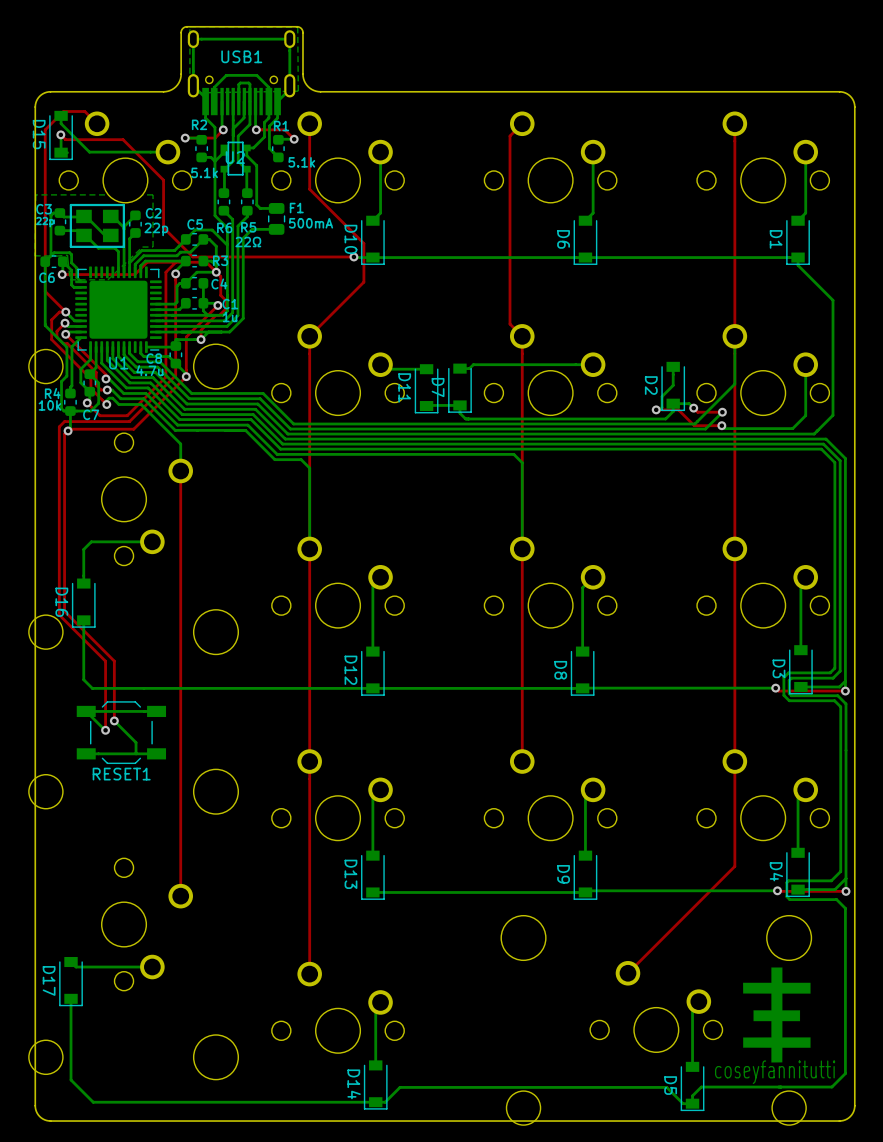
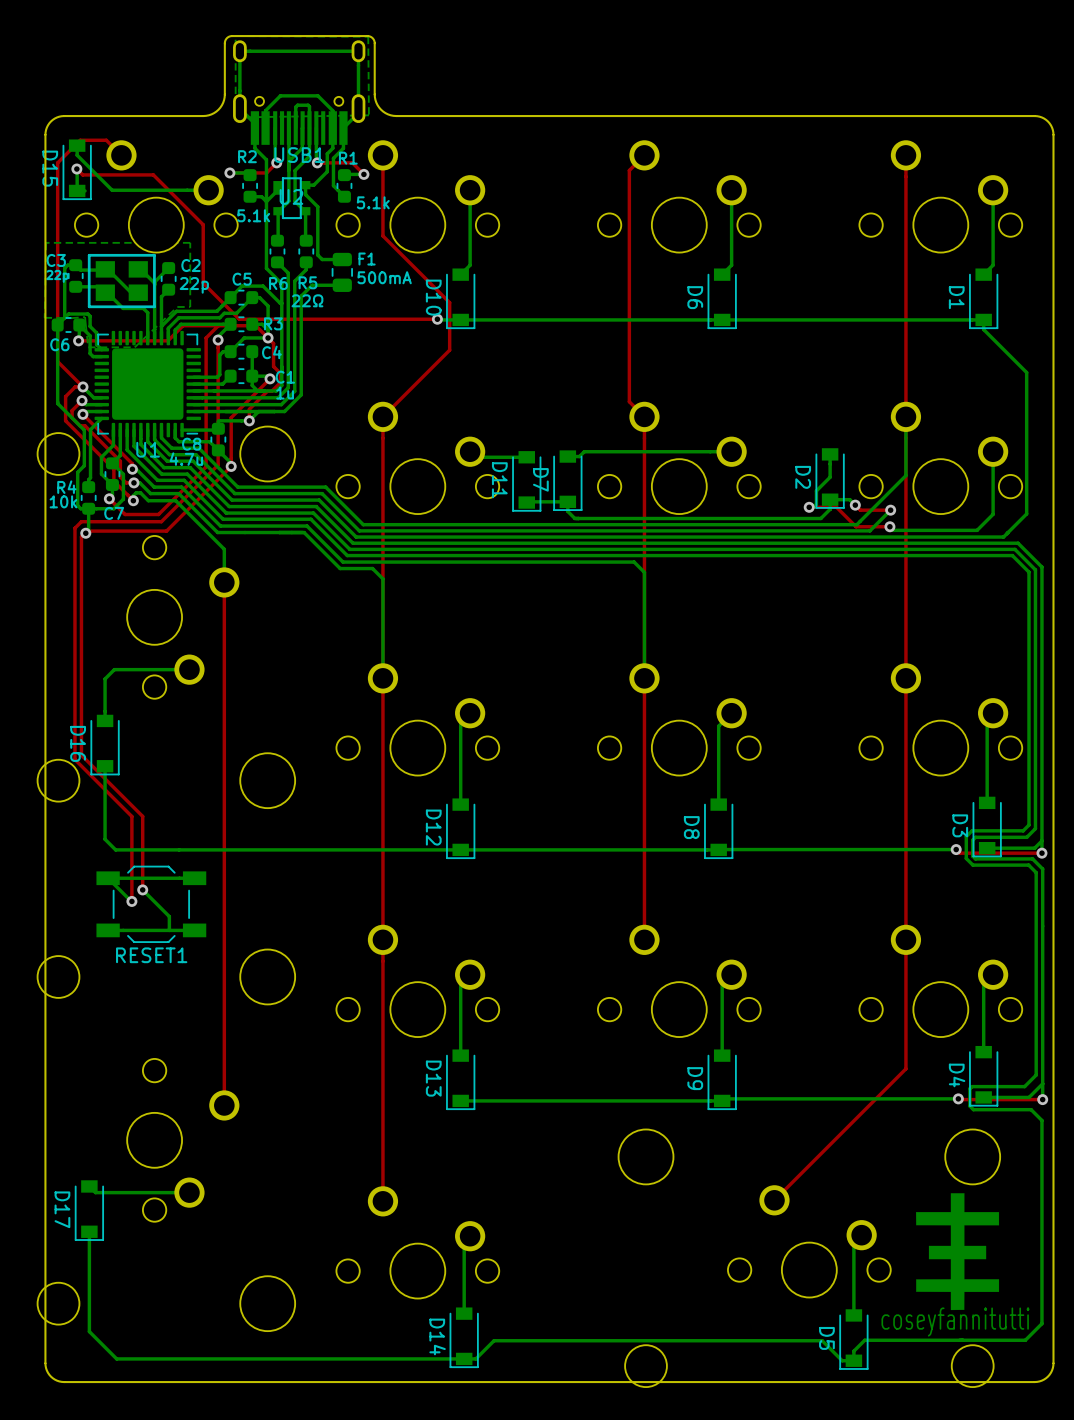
USB1 name position: USB1 (241, 56) -> USB1 (299, 155)

